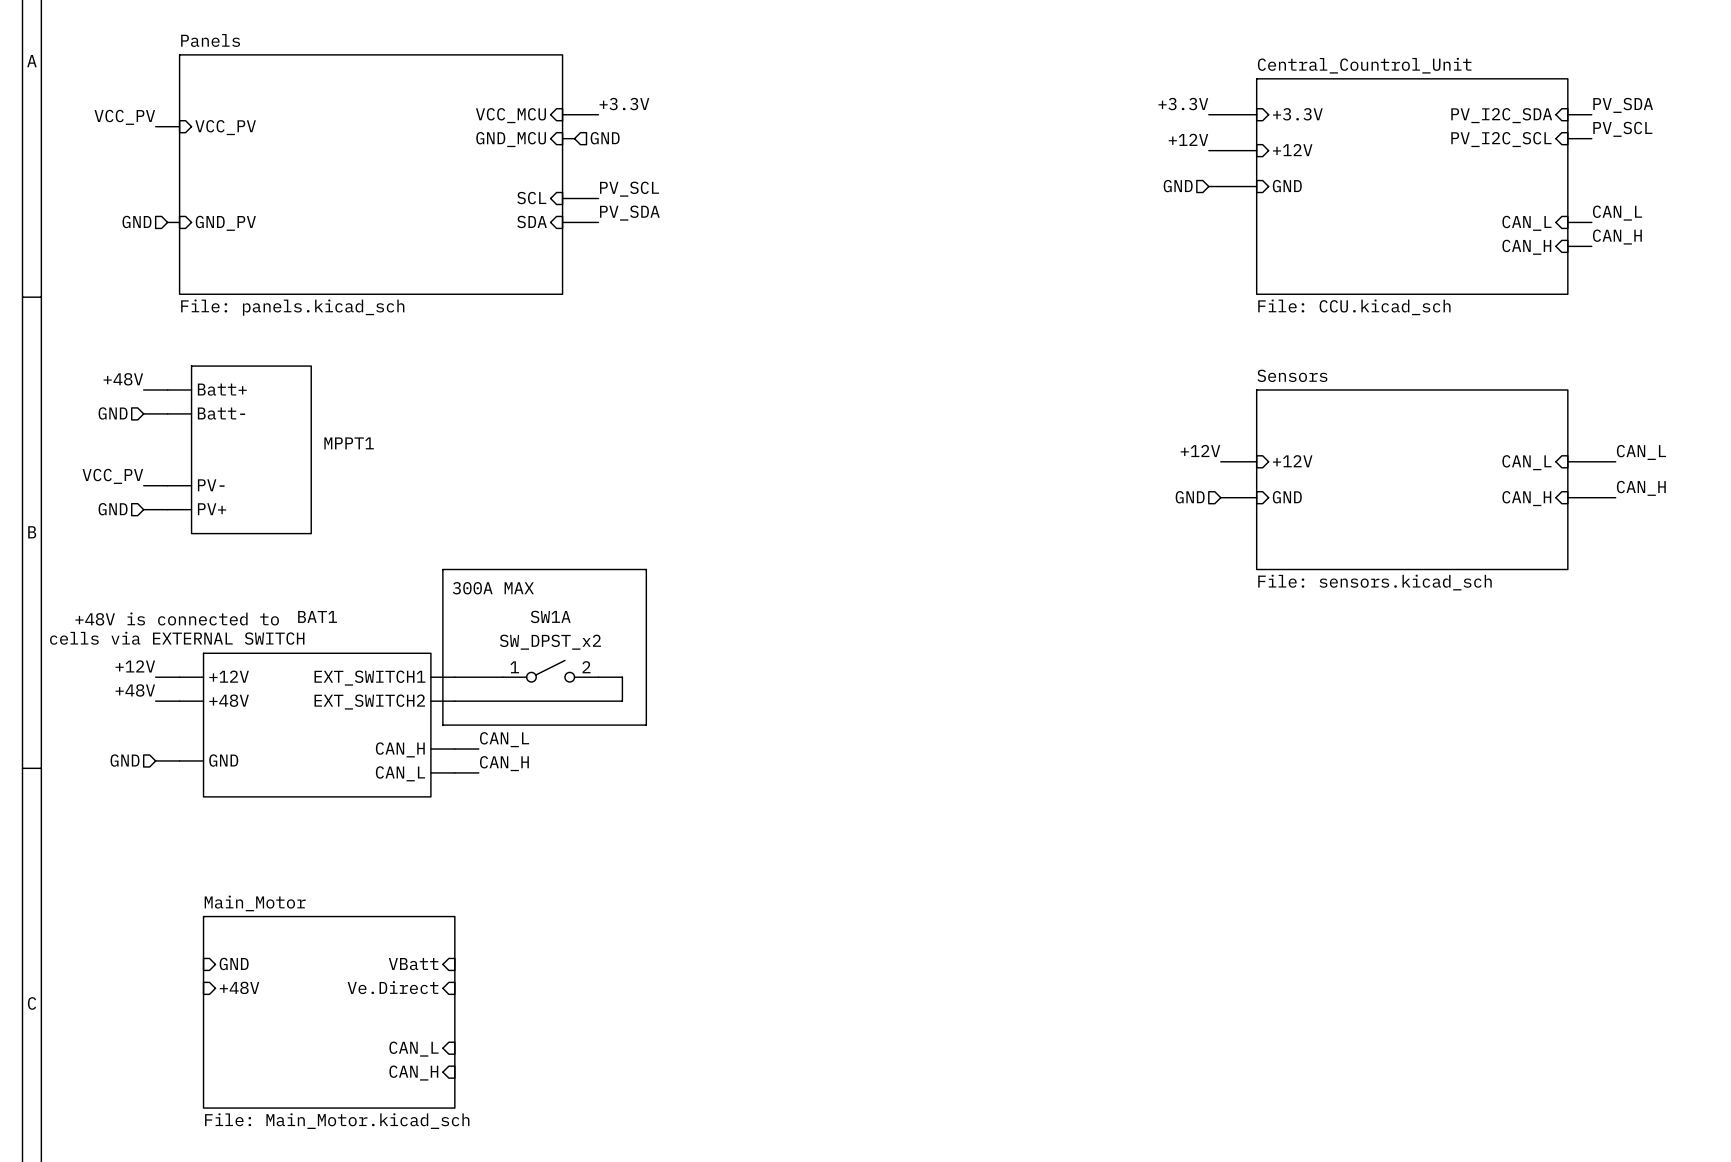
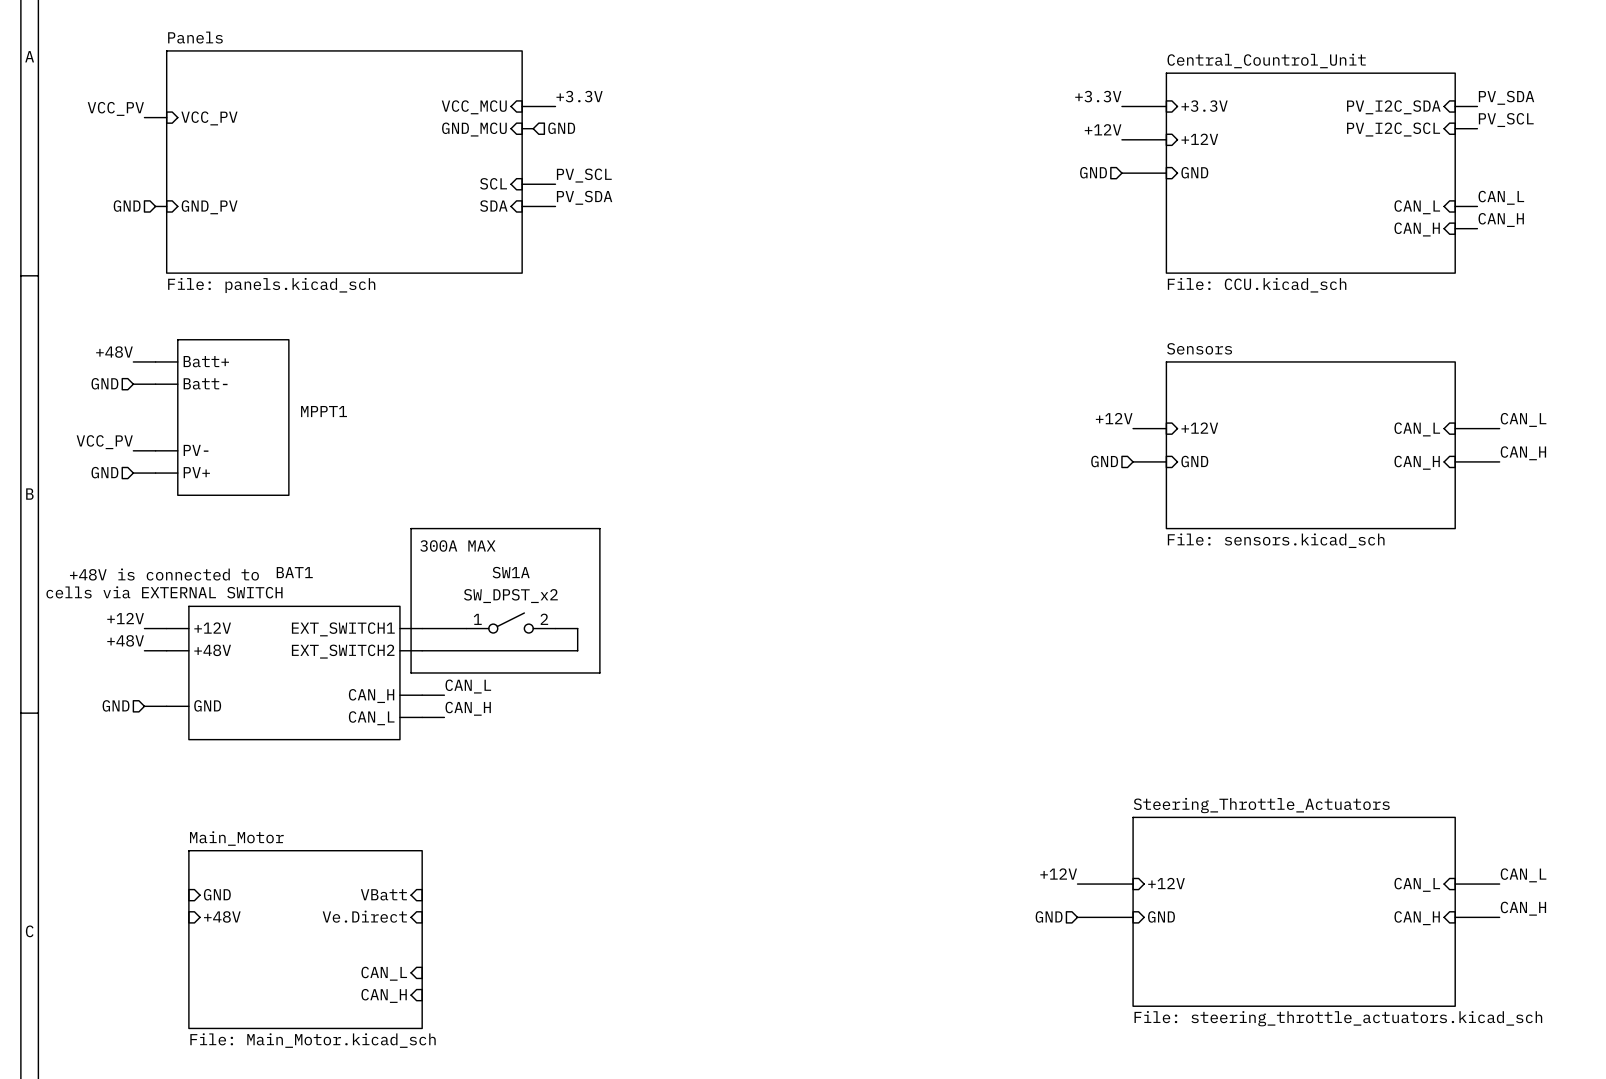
label: none -> +12V (1058, 874)
label: none -> CAN_L (1523, 875)
sheet pin: none -> +12V (1166, 883)
wire: none -> (1077, 884) (1133, 884)
wire: none -> (1455, 884) (1499, 884)
sheet pin: none -> CAN_L (1417, 884)
label: none -> CAN_H (1523, 908)
sheet Steering_Throttle_Actuators: none -> File: steering_throttle_actuators.kicad_sch (1294, 911)
hierarchical label: none -> GND (1049, 916)
sheet pin: none -> GND (1161, 916)
wire: none -> (1077, 917) (1133, 917)
wire: none -> (1455, 917) (1499, 917)
sheet pin: none -> CAN_H (1417, 918)

